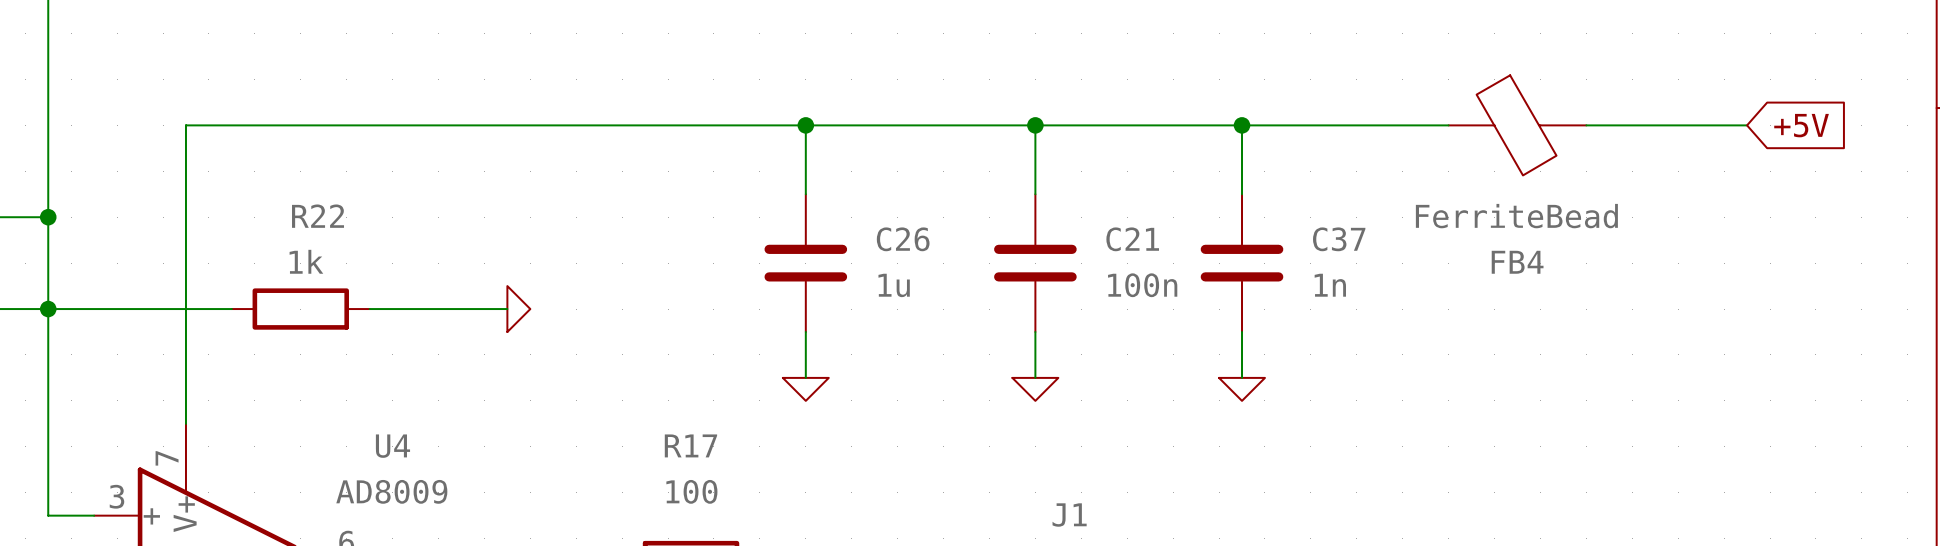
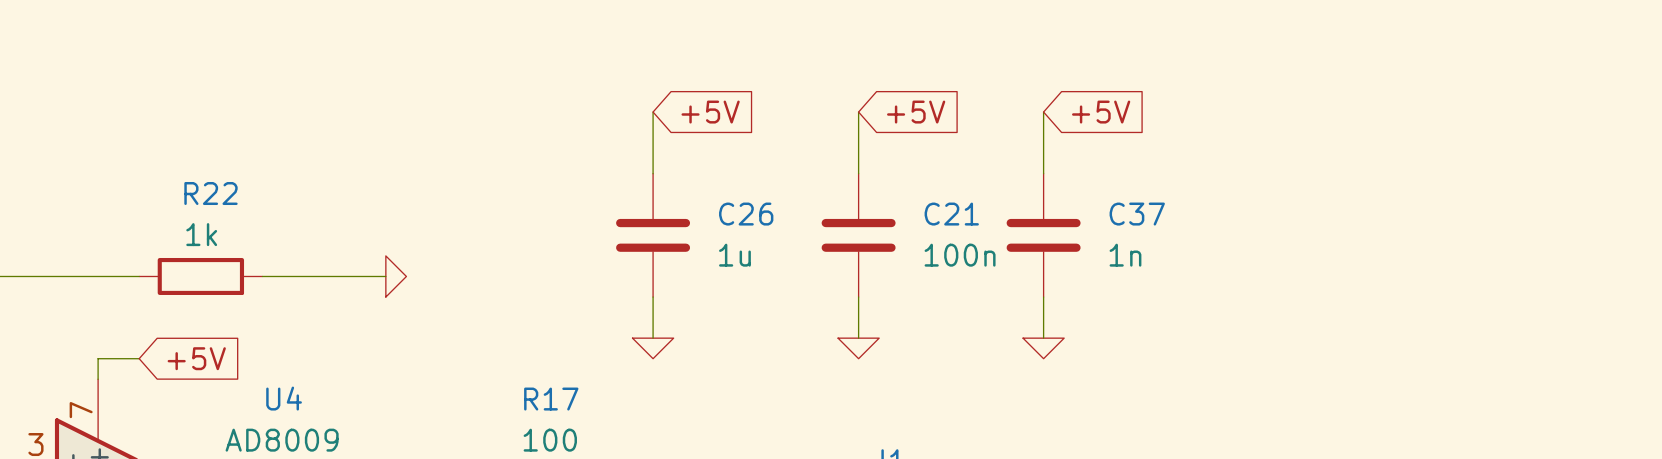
junction: (805, 125) -> none
global label: none -> +5V (710, 112)
junction: (1035, 125) -> none
global label: none -> +5V (916, 112)
junction: (1242, 125) -> none
global label: none -> +5V (1101, 112)
wire: (1448, 125) (185, 125) (185, 400) -> (139, 358) (98, 358)
FB4: FerriteBead (1517, 125) -> none
wire: (1586, 125) (1747, 125) -> none
global label: +5V (1801, 125) -> none
global label: none -> +5V (196, 358)

